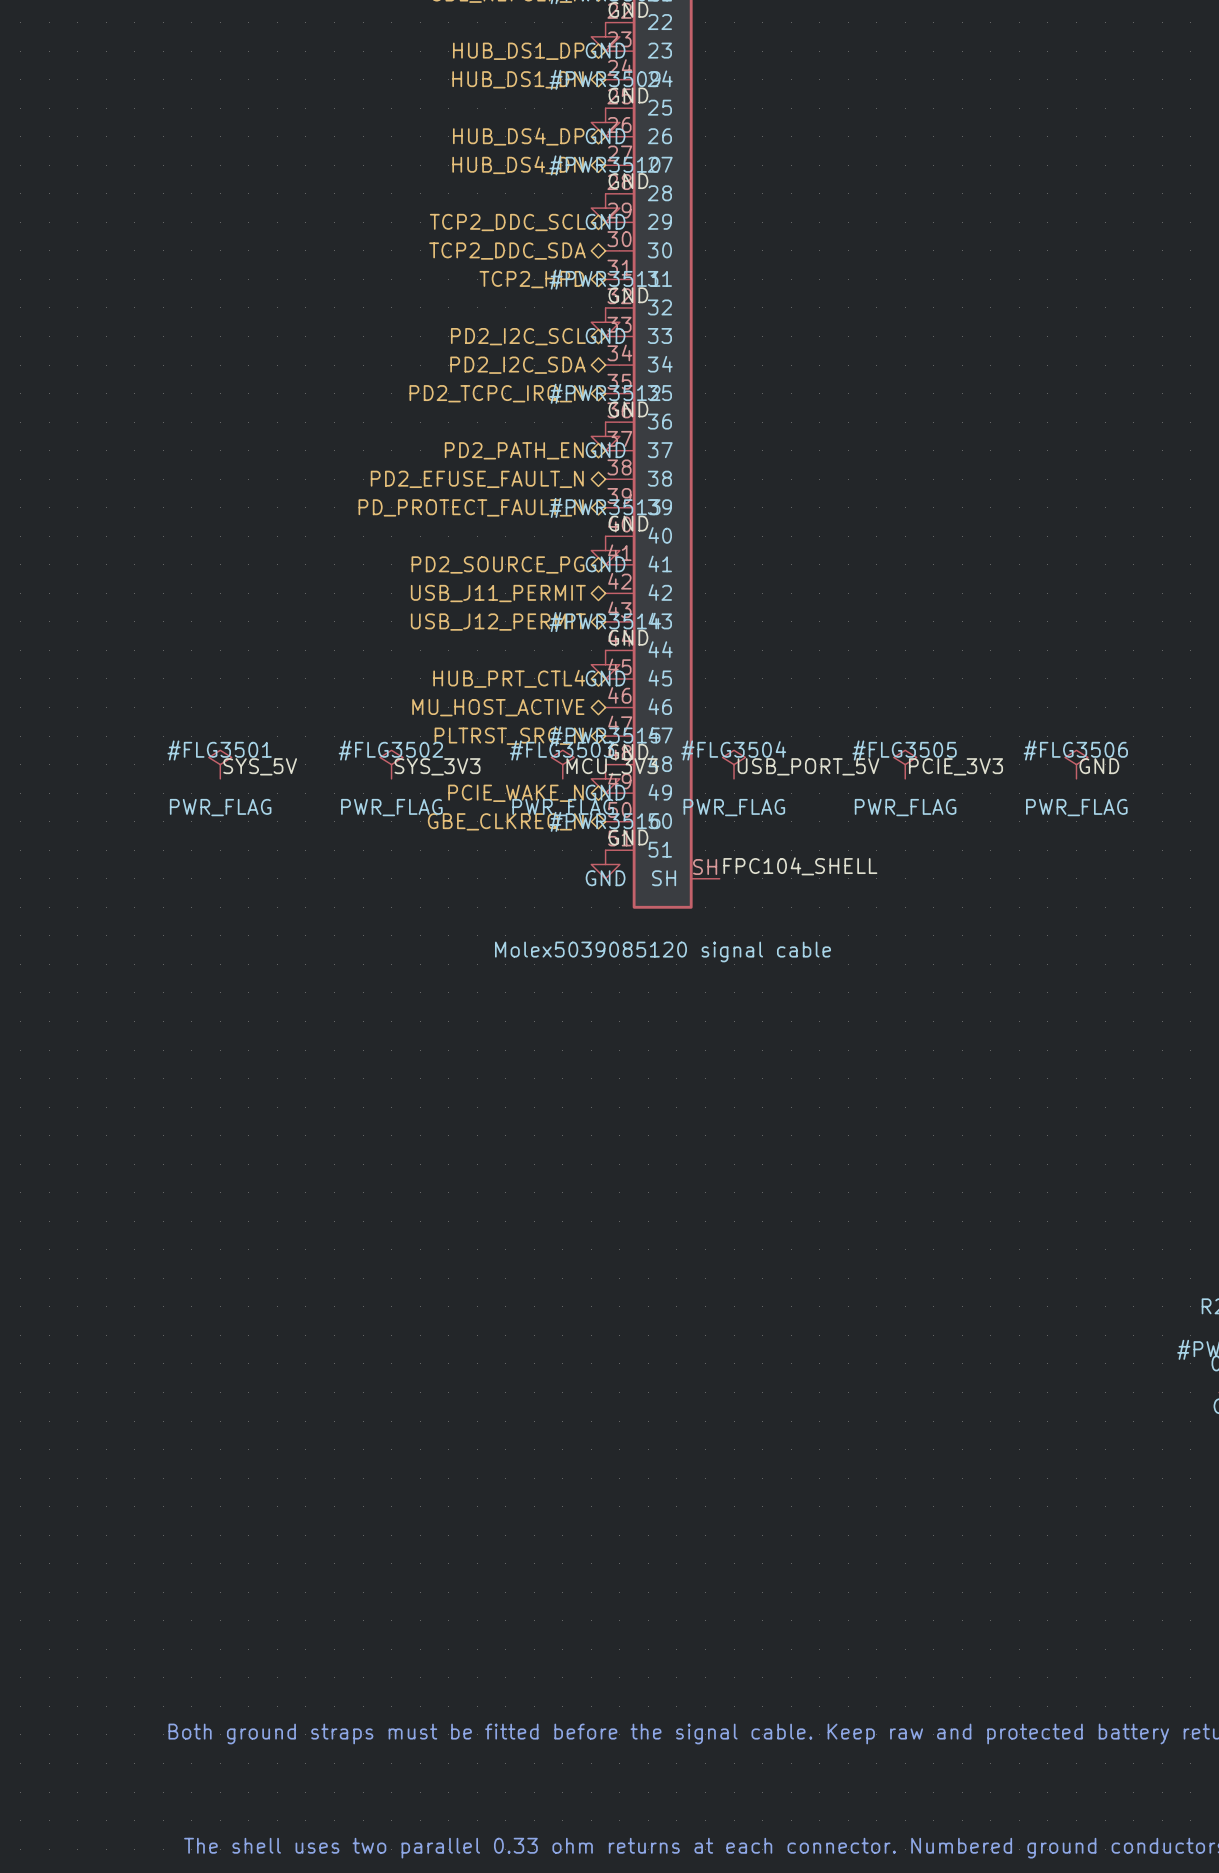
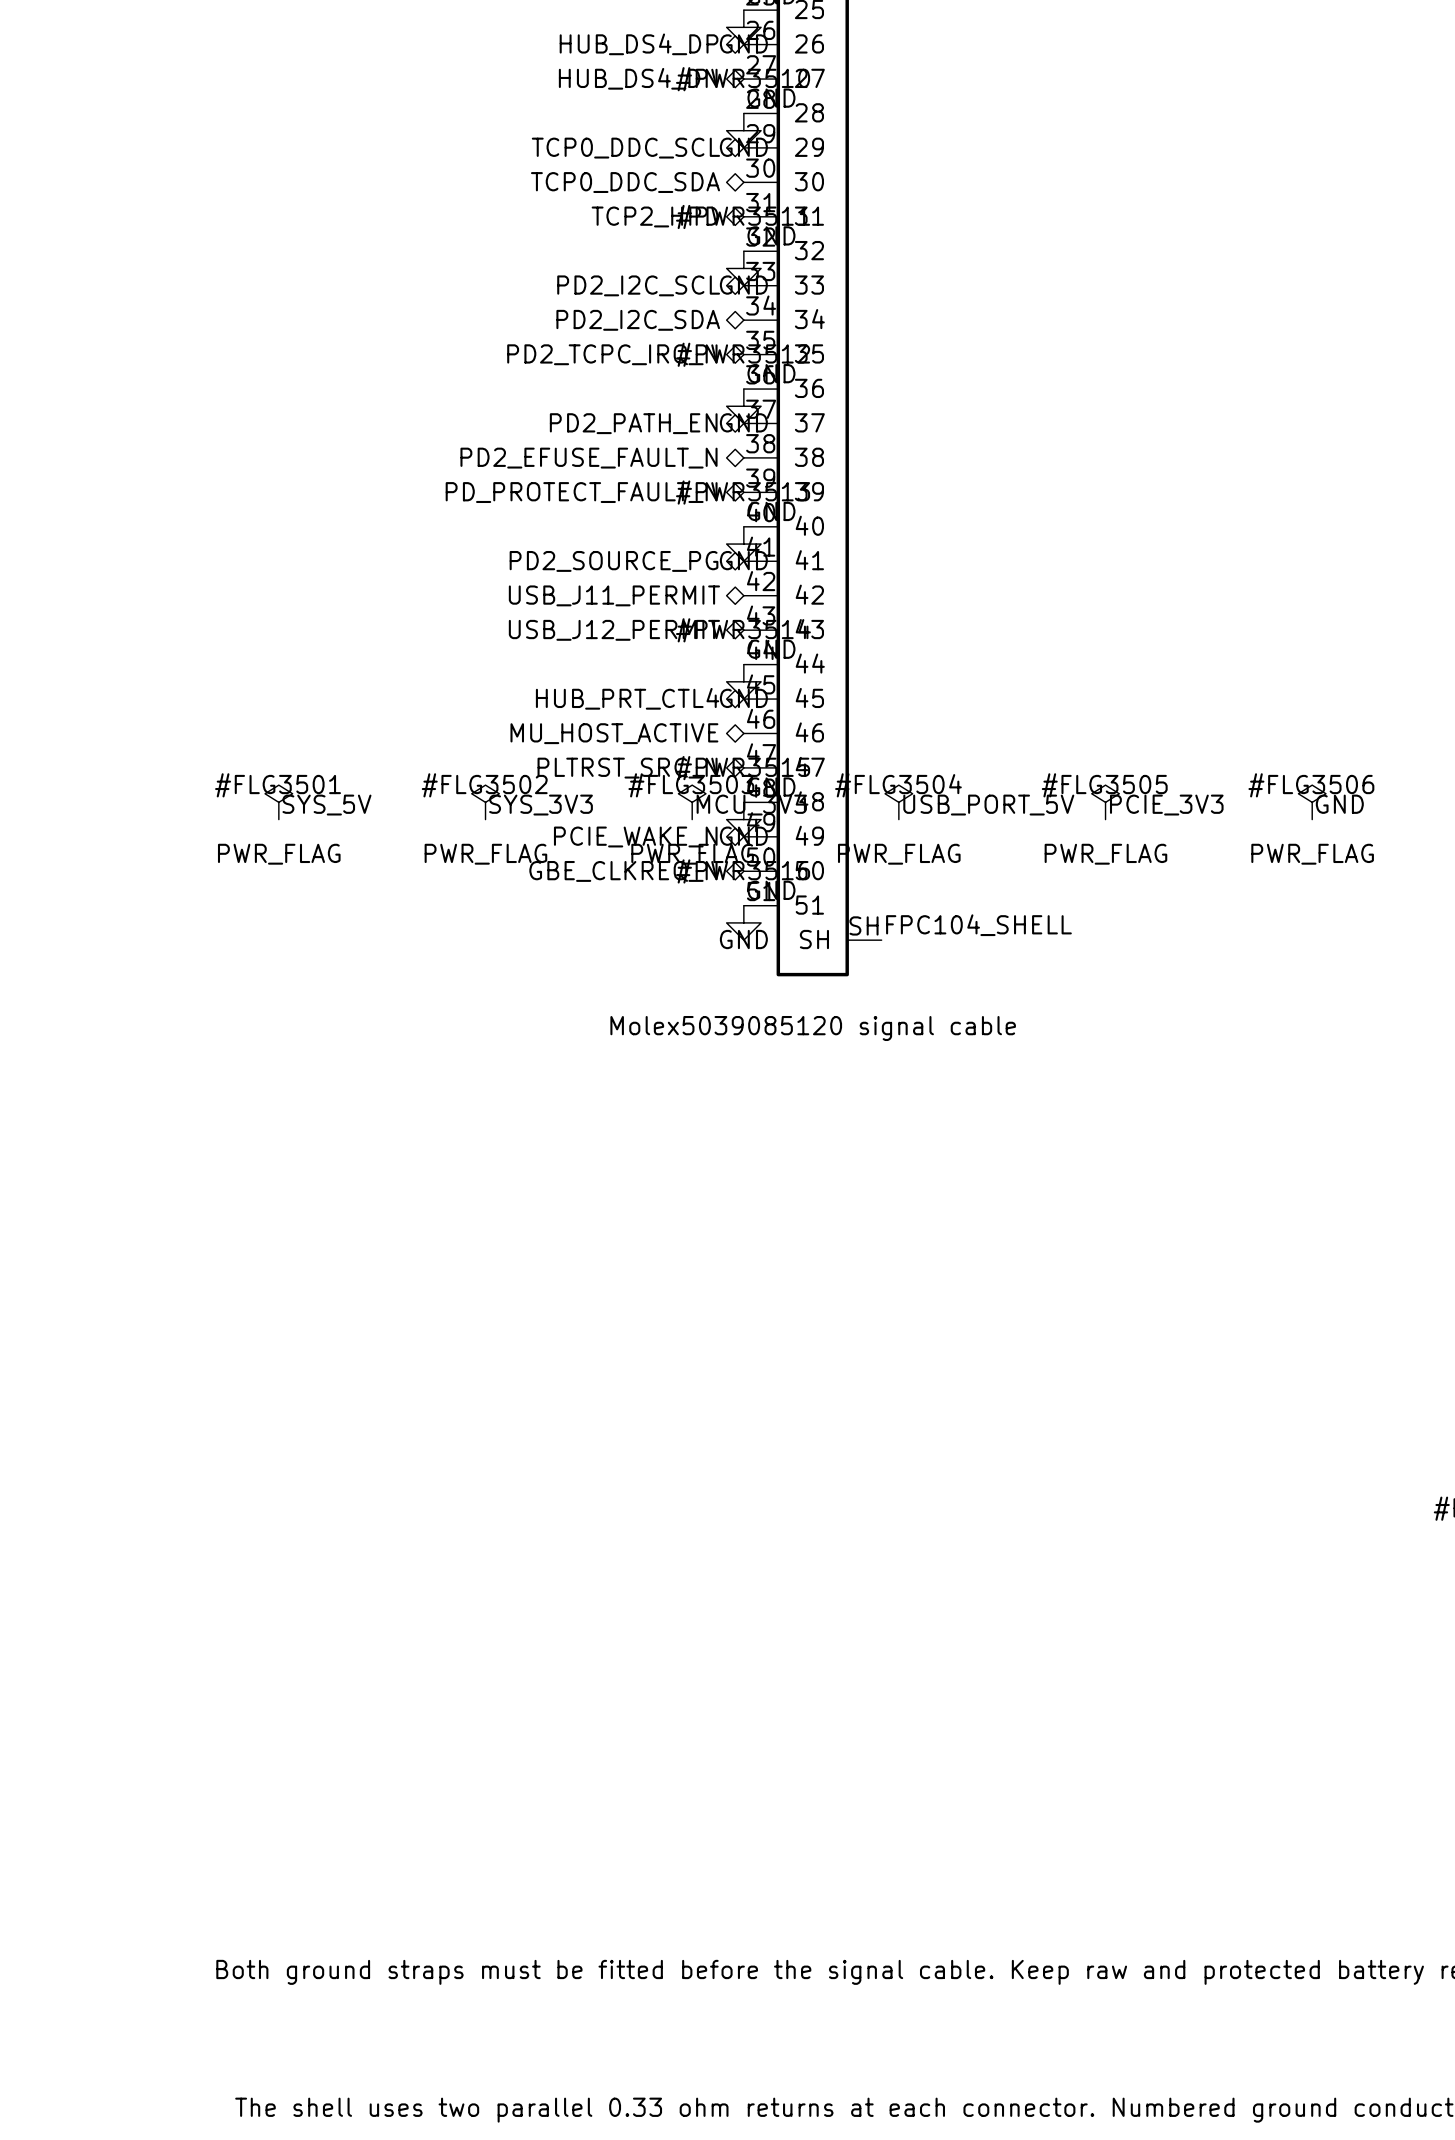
hierarchical label: TCP2_DDC_SCL (507, 222) -> TCP0_DDC_SCL (625, 148)
hierarchical label: TCP2_DDC_SDA (507, 251) -> TCP0_DDC_SDA (625, 182)

